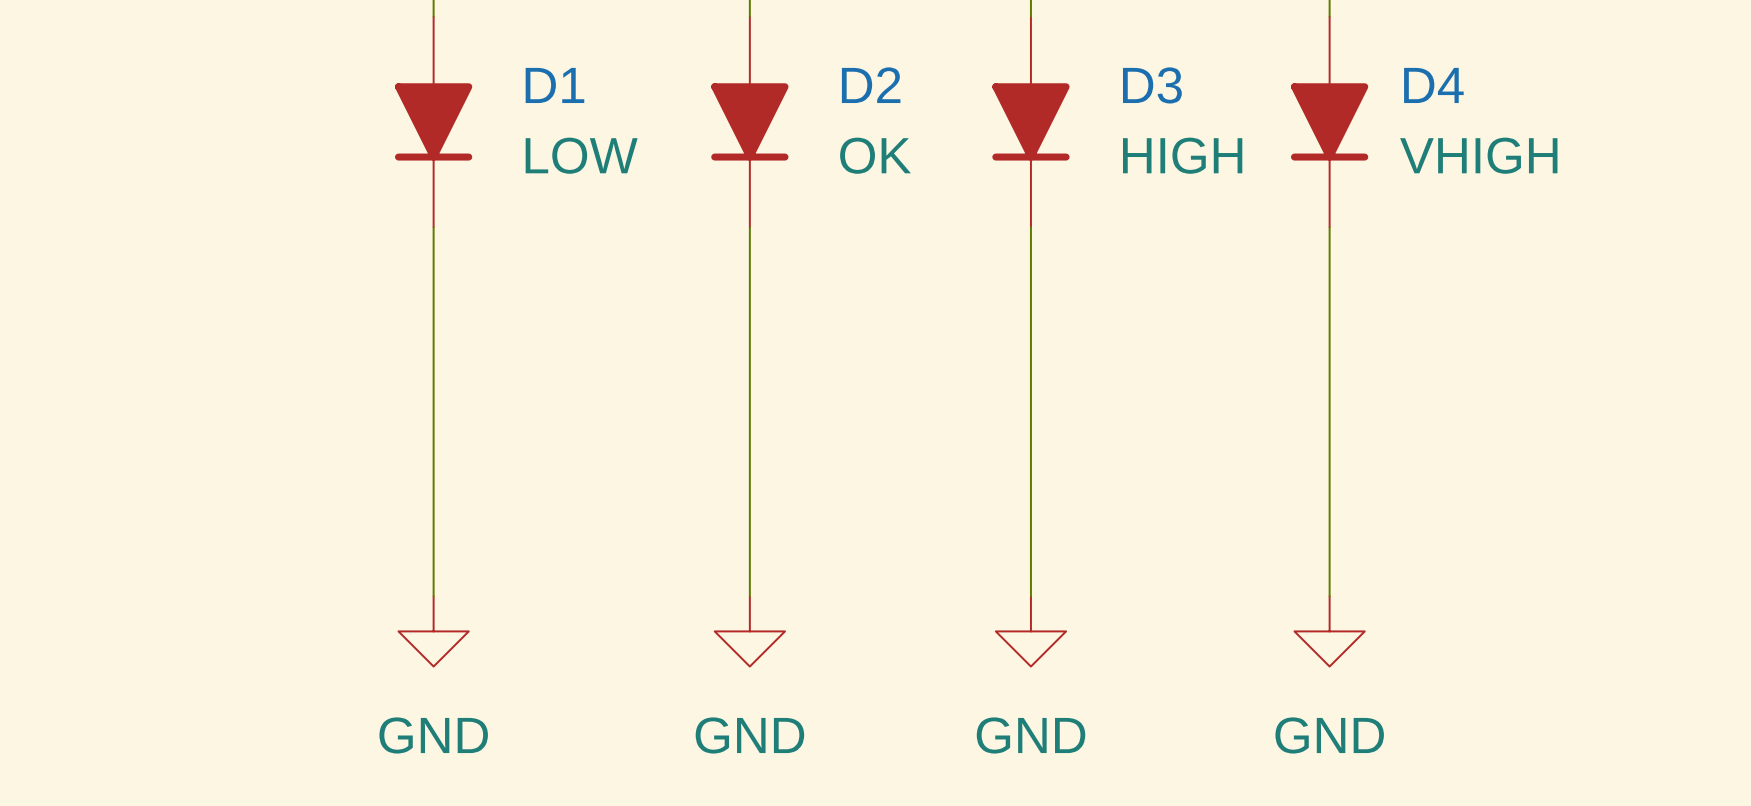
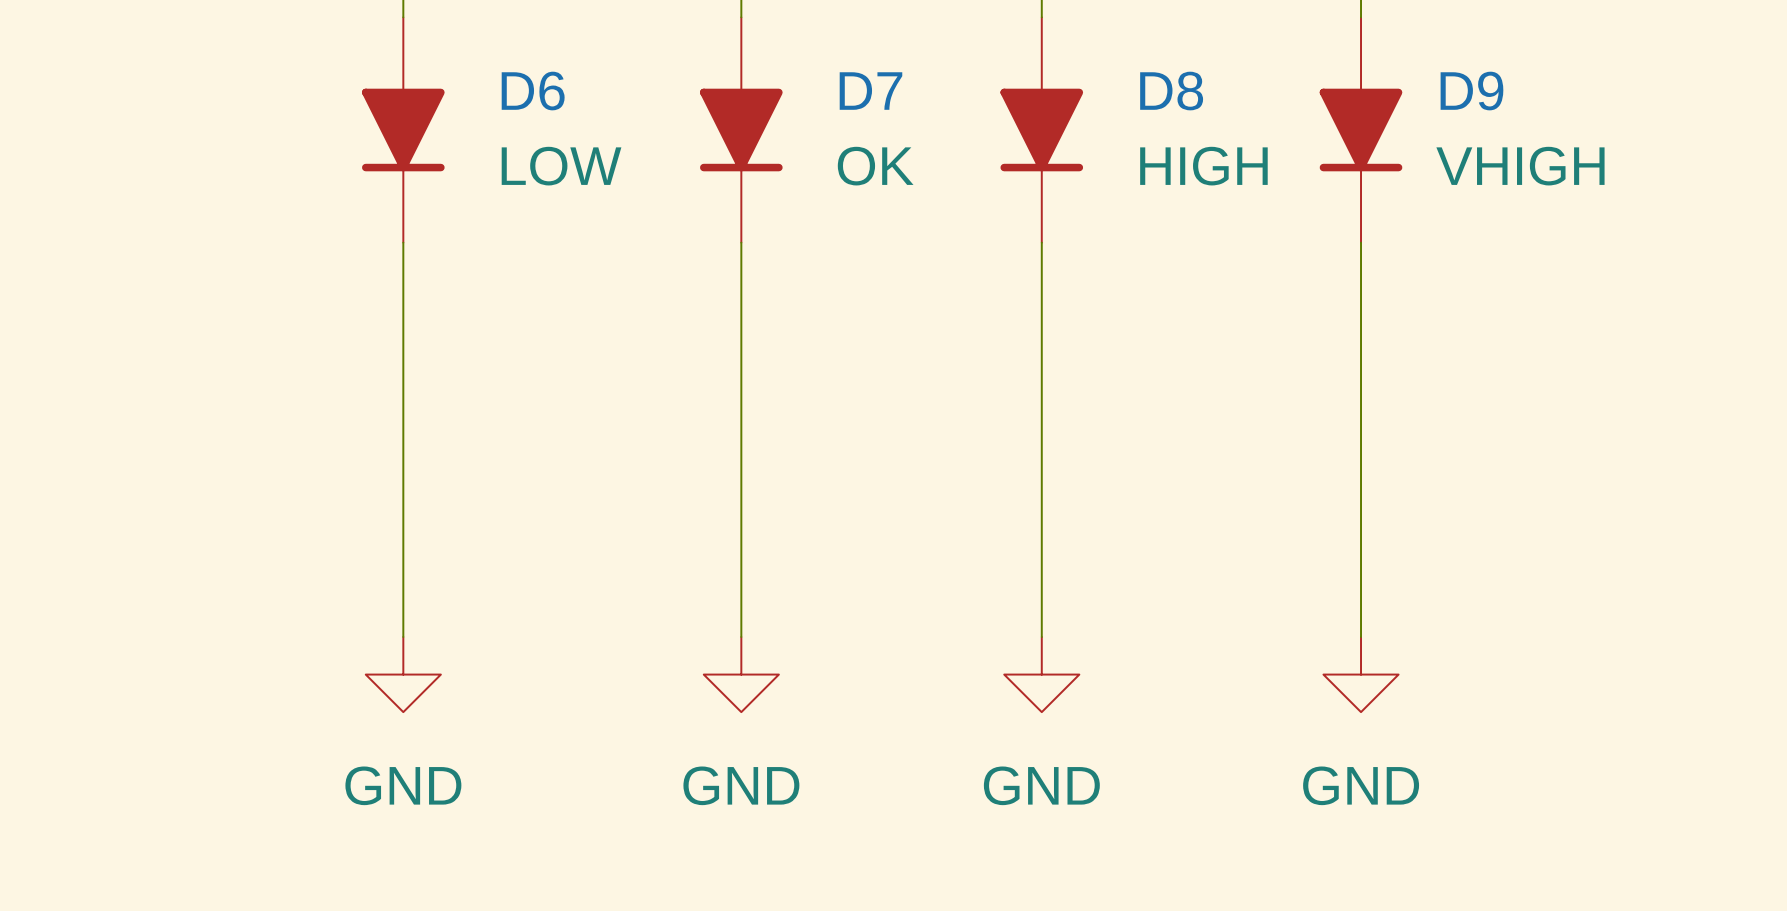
D1 name: D1 (554, 85) -> D6 (533, 91)
D2 name: D2 (871, 85) -> D7 (870, 91)
D3 name: D3 (1152, 85) -> D8 (1171, 91)
D4 name: D4 (1433, 85) -> D9 (1471, 91)

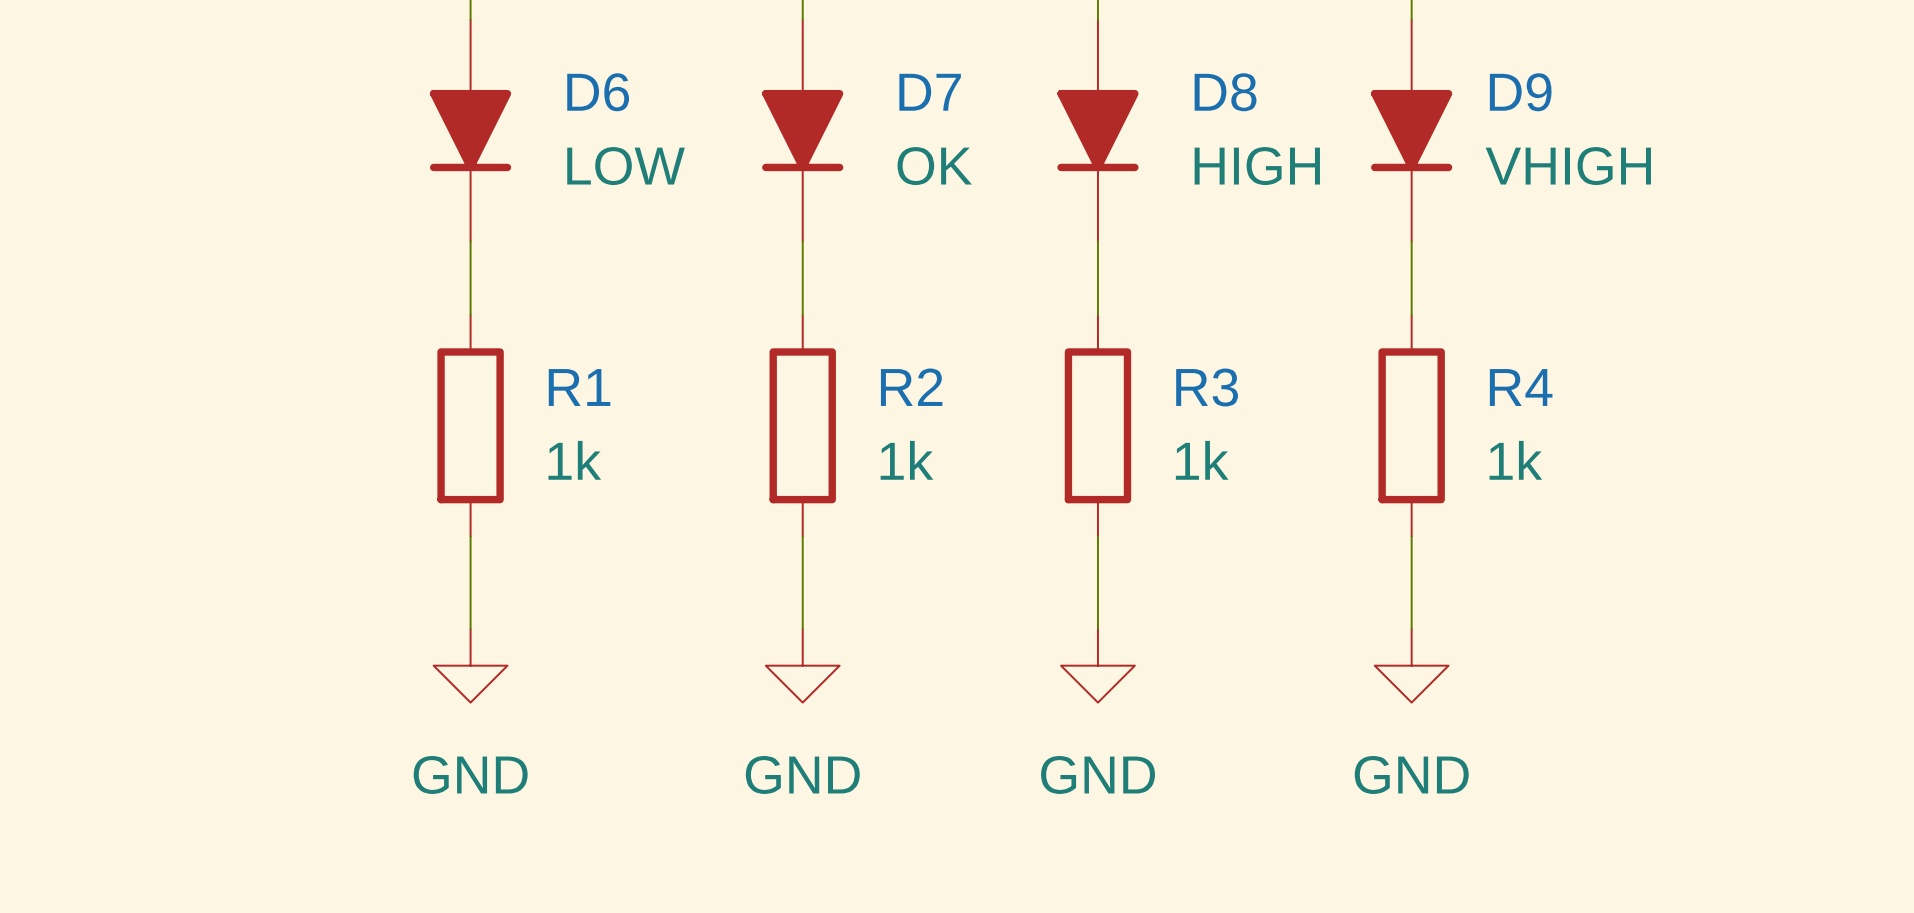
wire: (403, 317) (403, 543) -> none
wire: (741, 317) (741, 543) -> none
wire: (1041, 317) (1041, 543) -> none
wire: (1361, 317) (1361, 543) -> none
R1: none -> 1k (470, 425)
R2: none -> 1k (802, 425)
R3: none -> 1k (1097, 425)
R4: none -> 1k (1411, 425)

